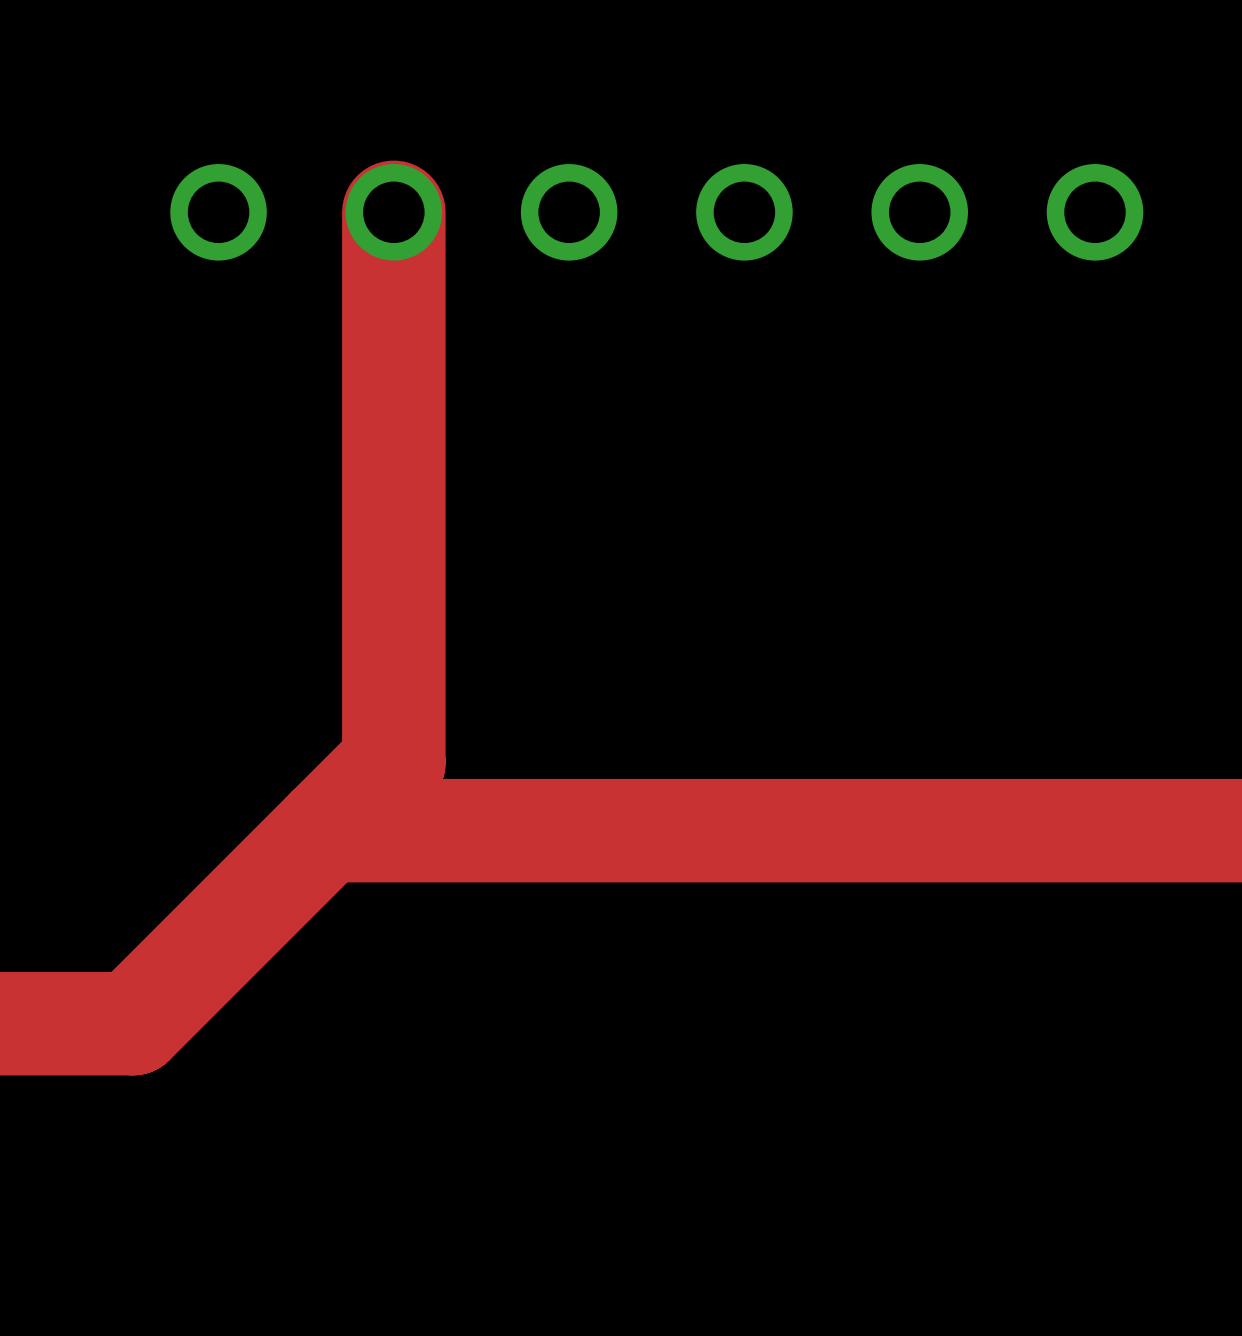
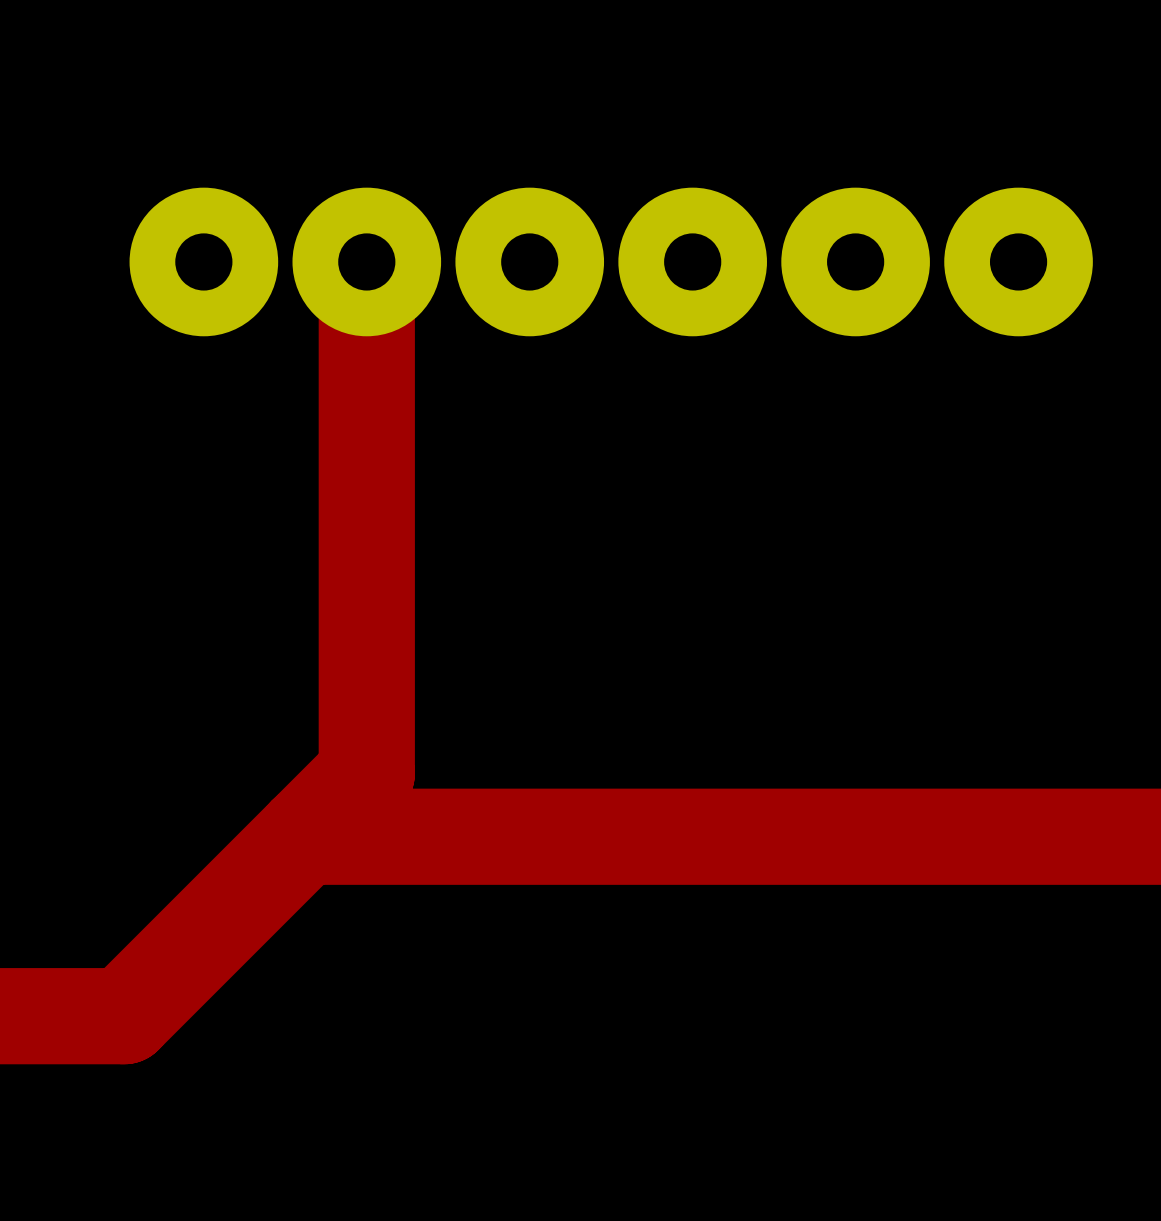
part footprint: [170, 164, 1144, 261] -> [129, 187, 1093, 337]

